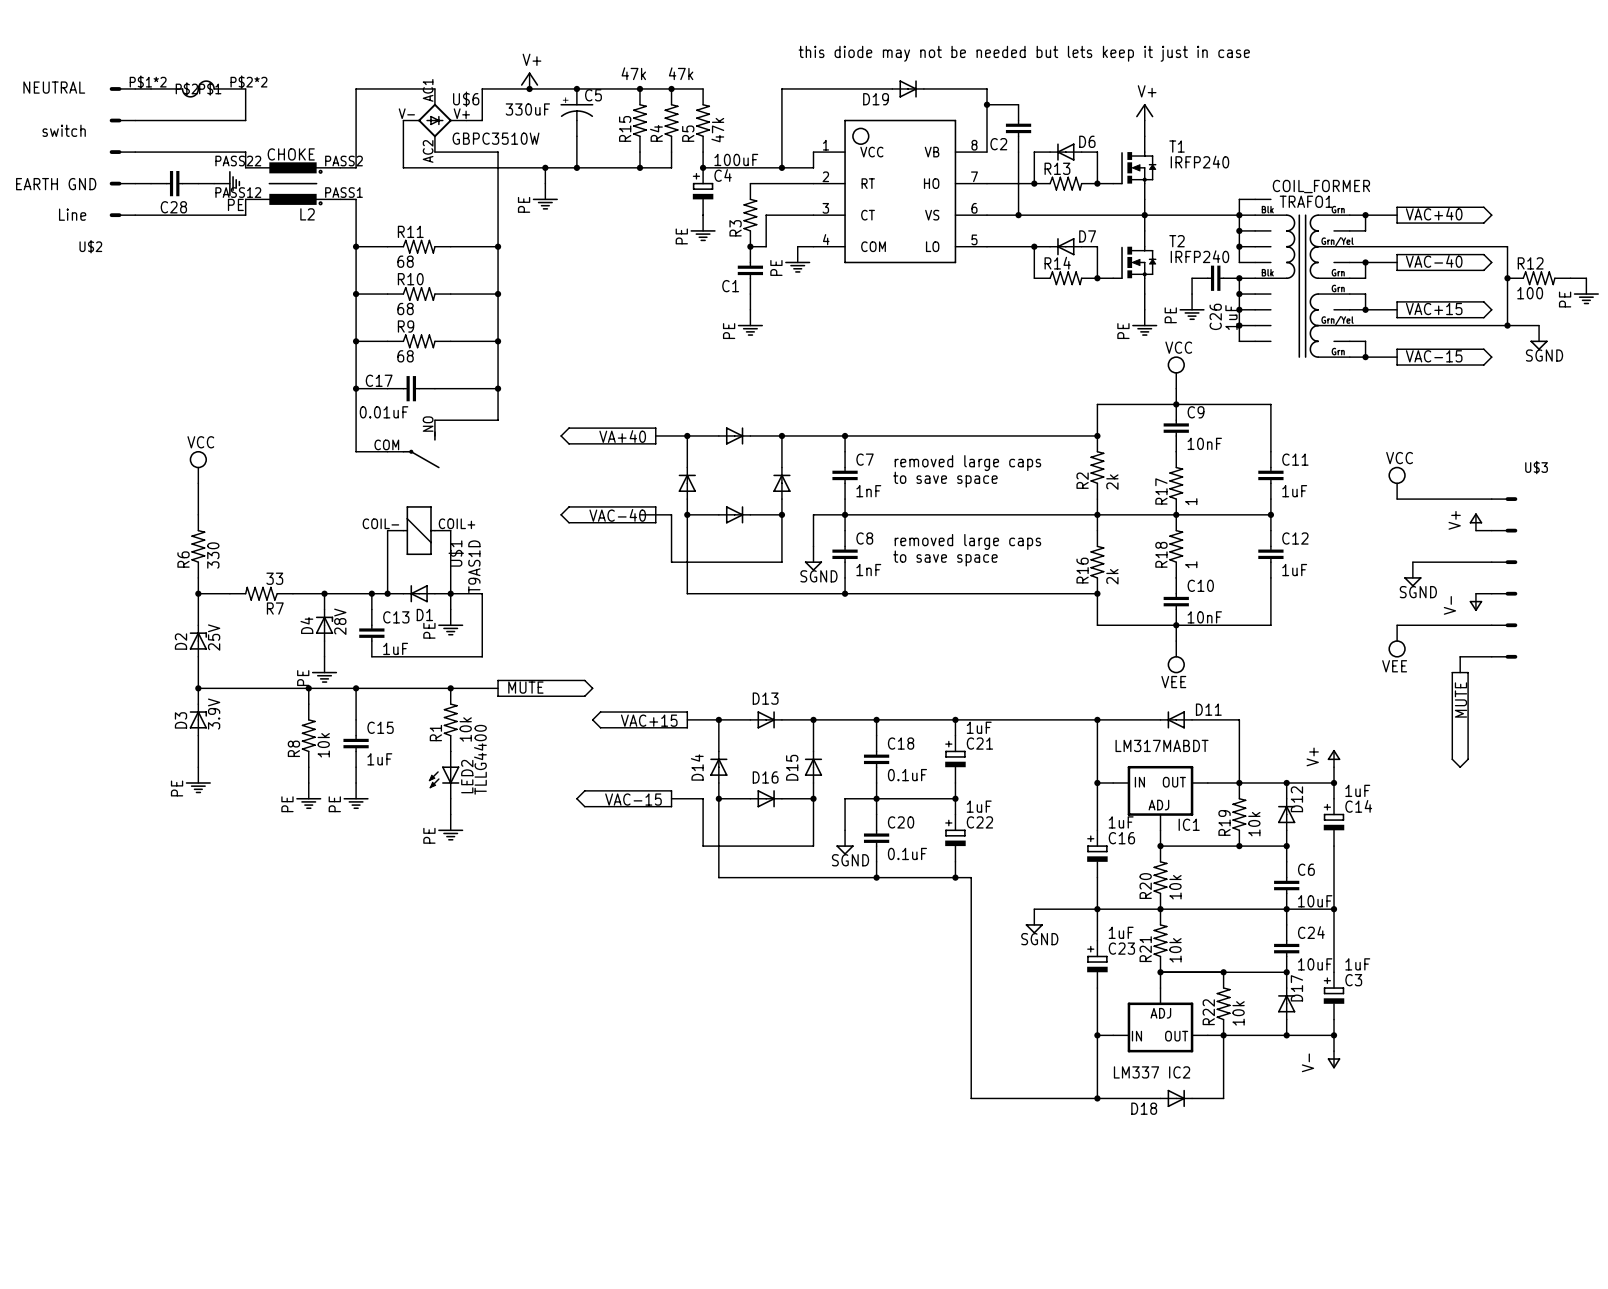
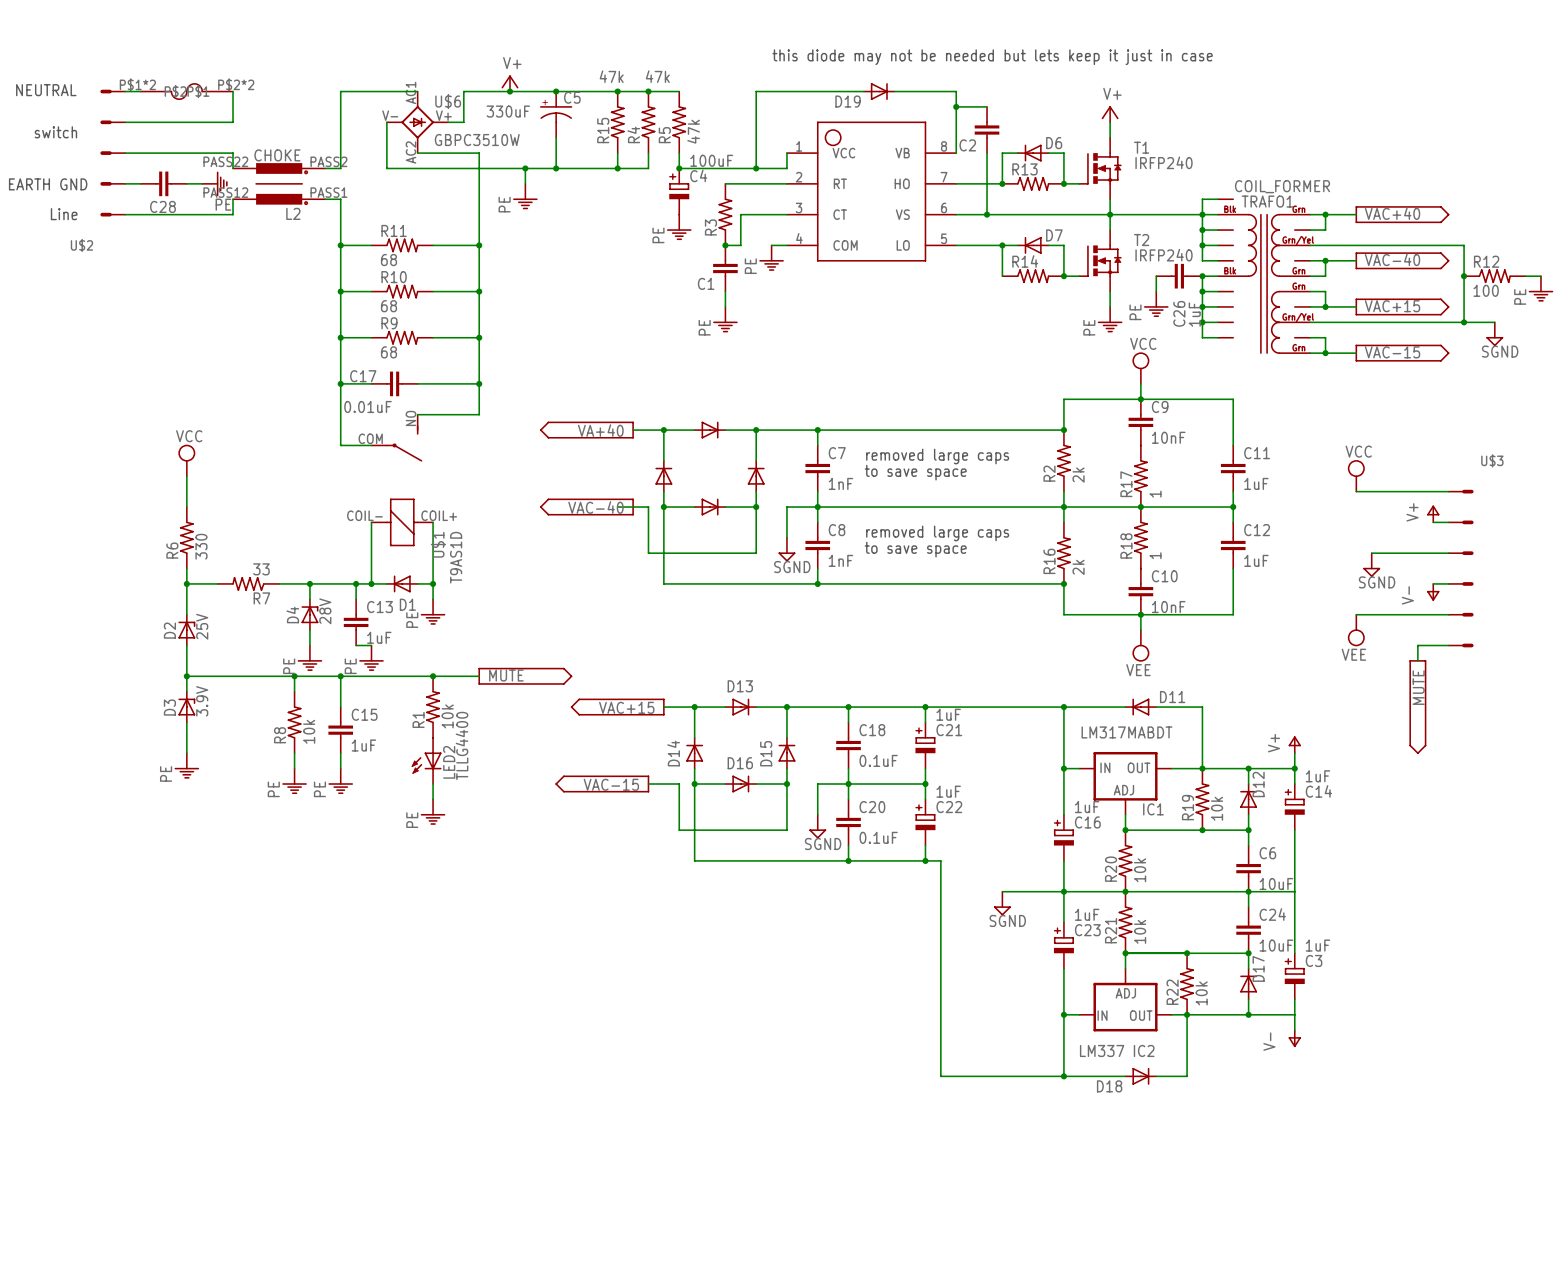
wire: (450, 593) (482, 593) (482, 656) (387, 656) -> none
power symbol: none -> PE (371, 658)
junction: (1334, 909) -> none
junction: (1334, 1035) -> none

